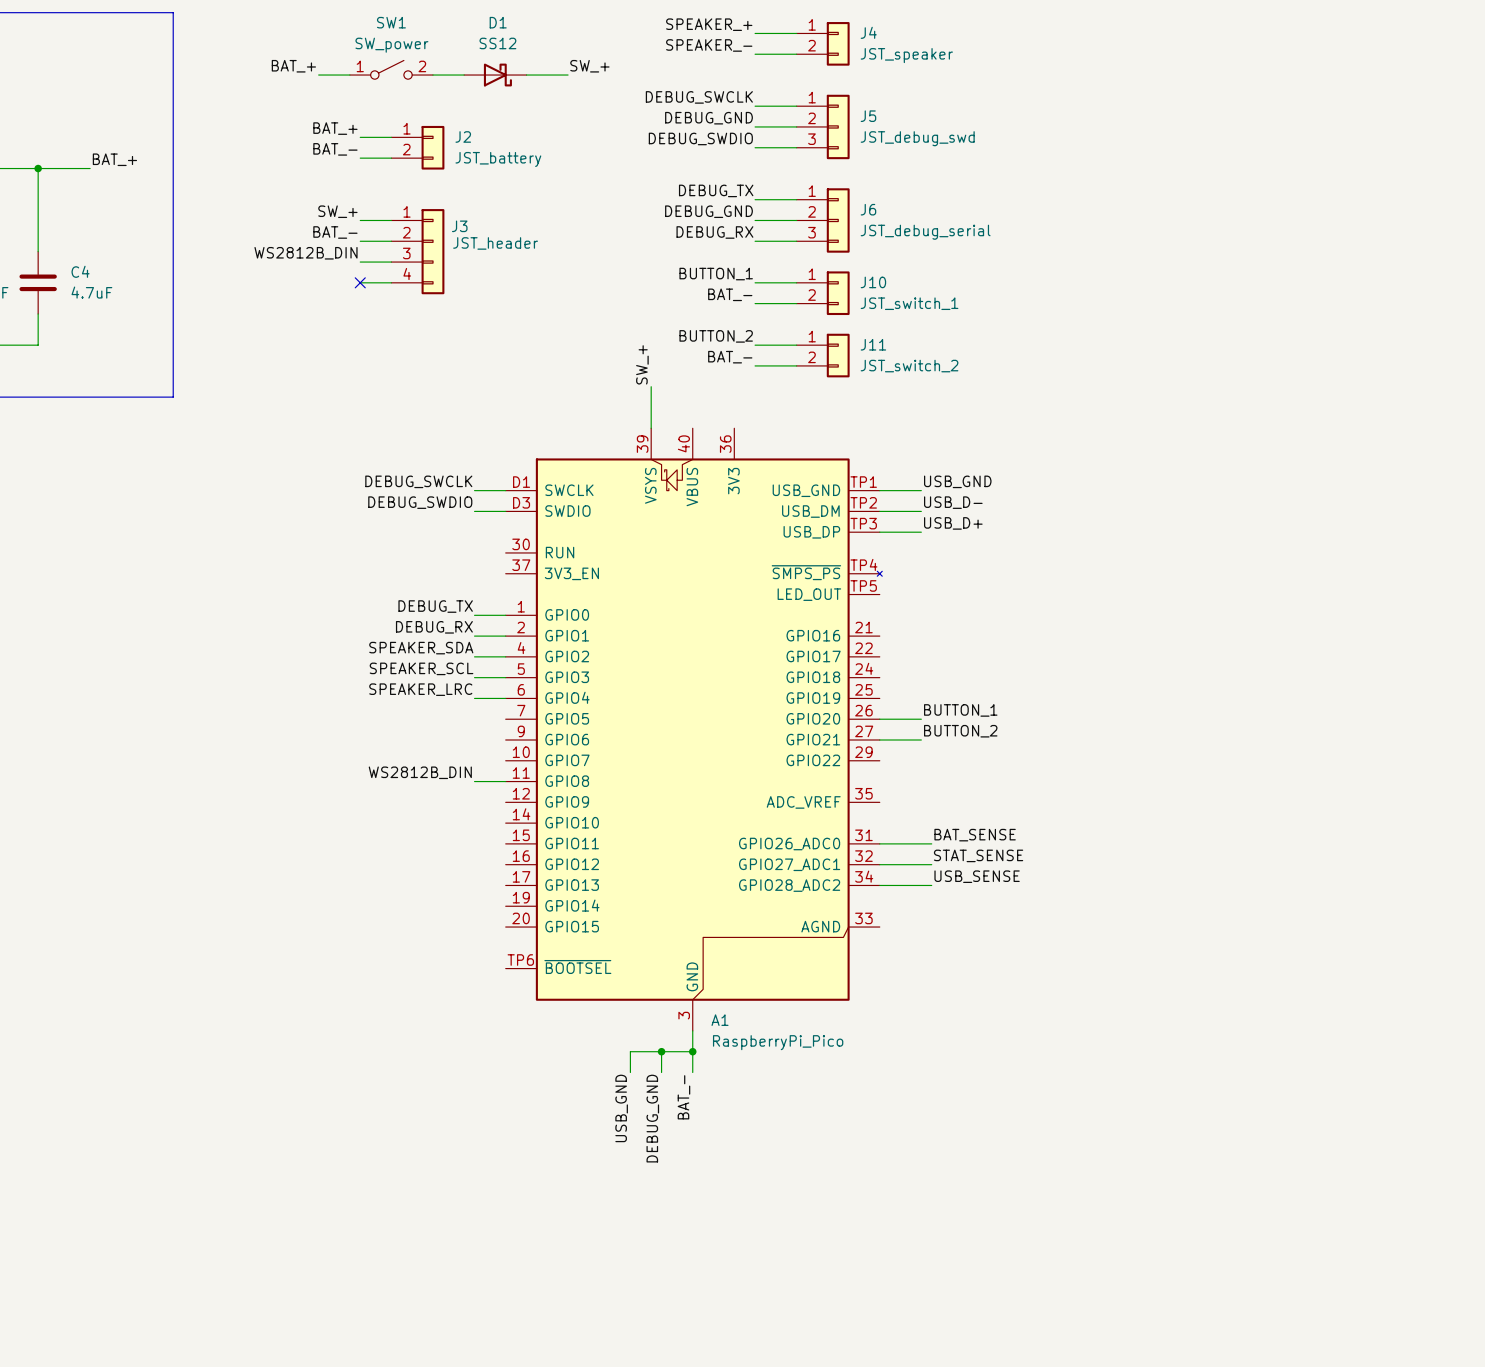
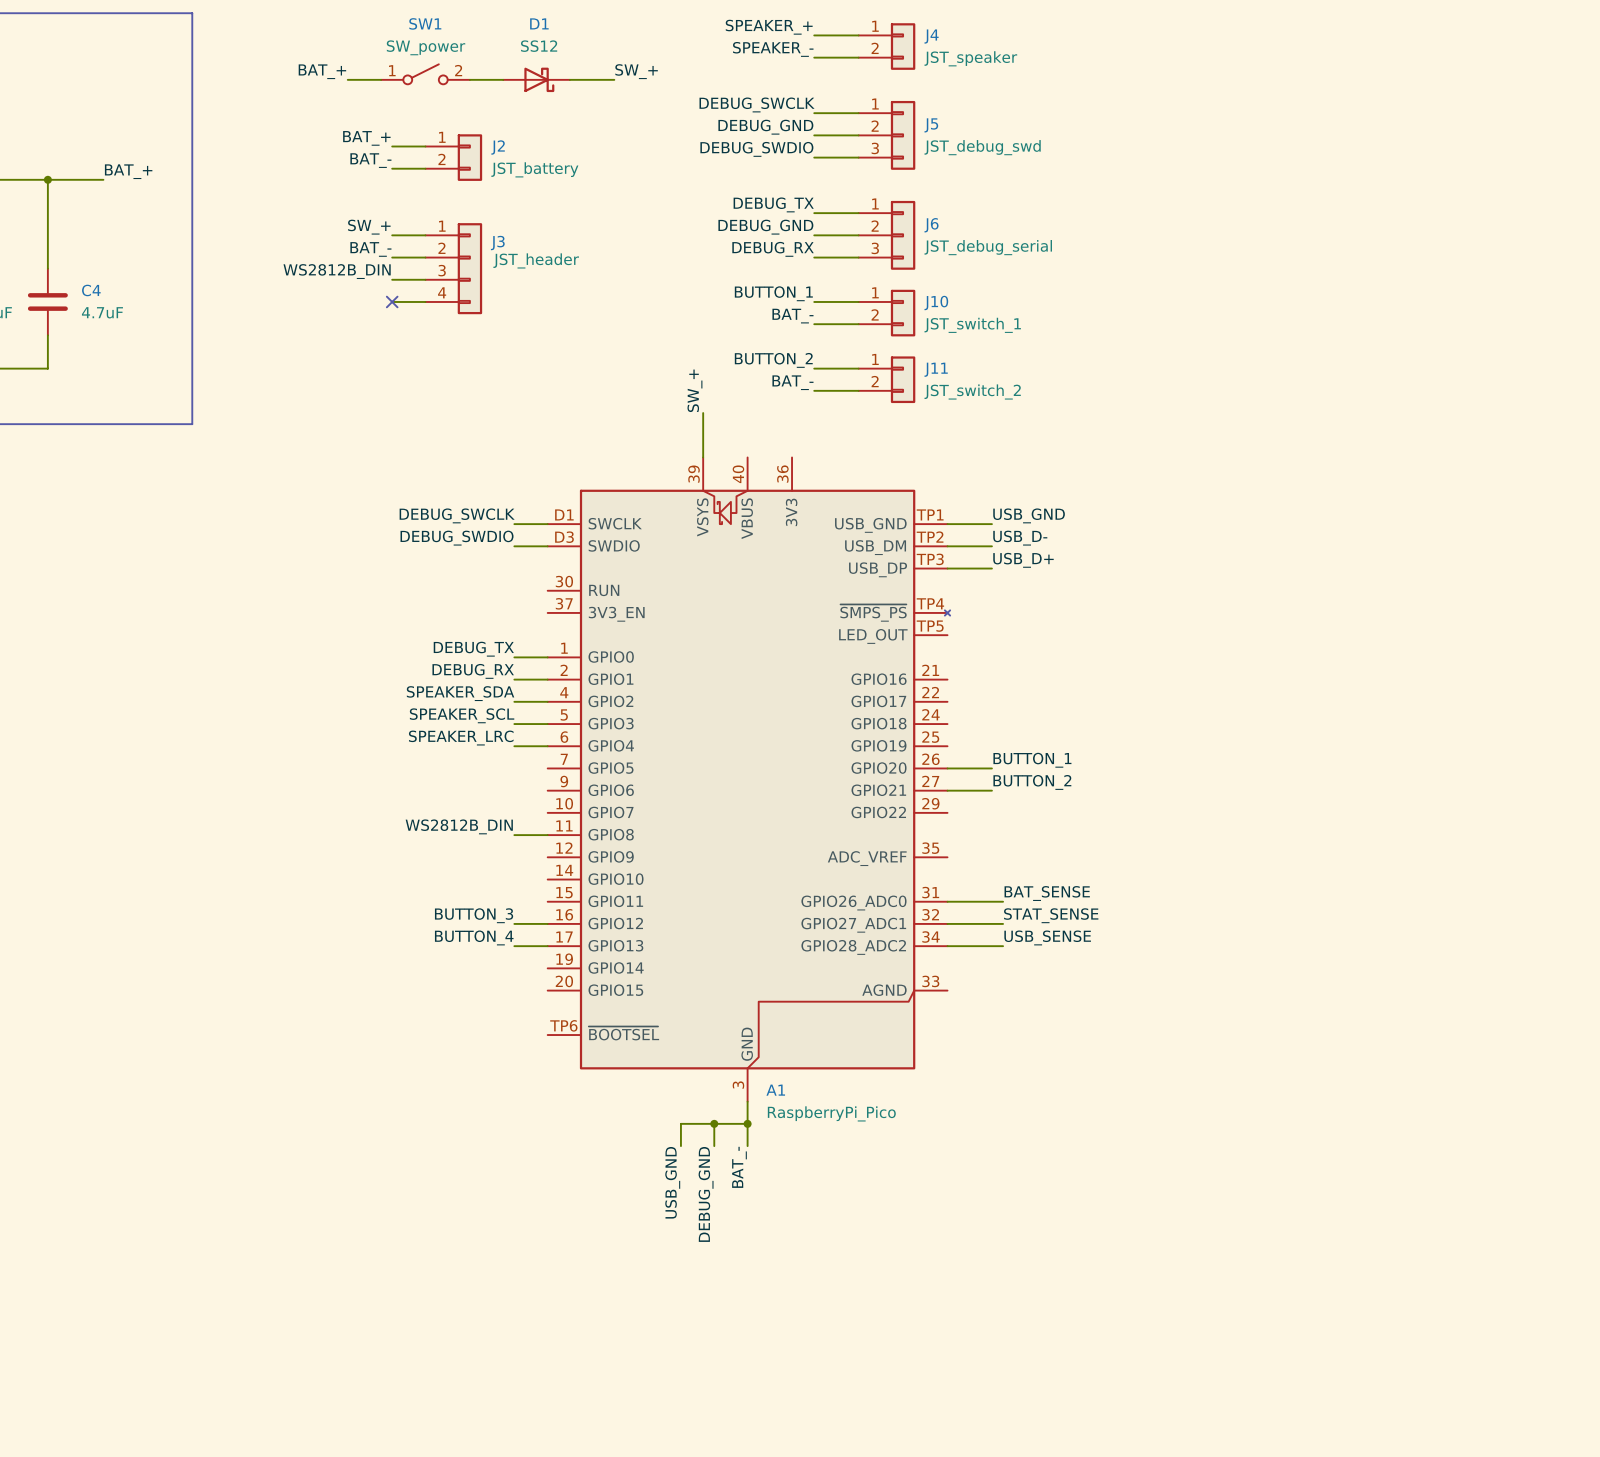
label: none -> BUTTON_3 (474, 915)
wire: none -> (514, 923) (547, 923)
label: none -> BUTTON_4 (474, 937)
wire: none -> (514, 946) (547, 946)

